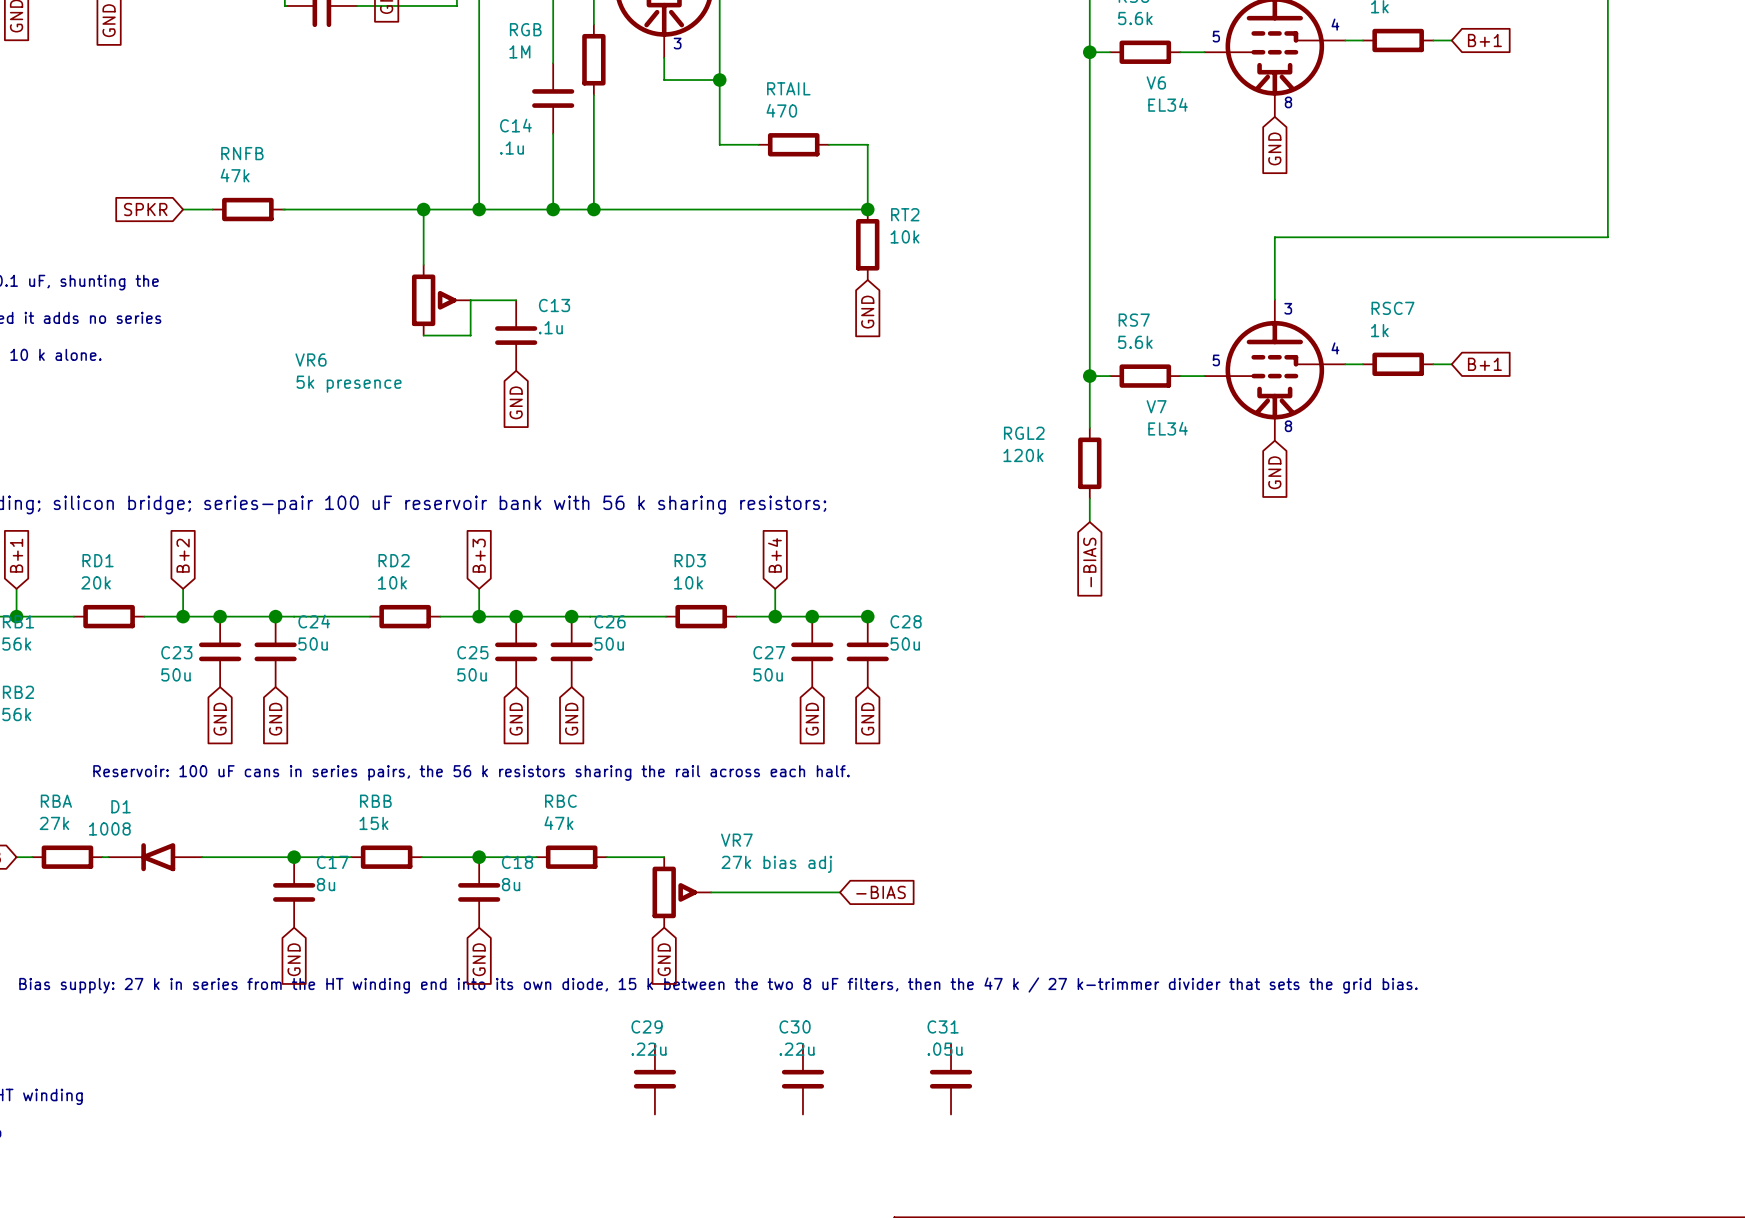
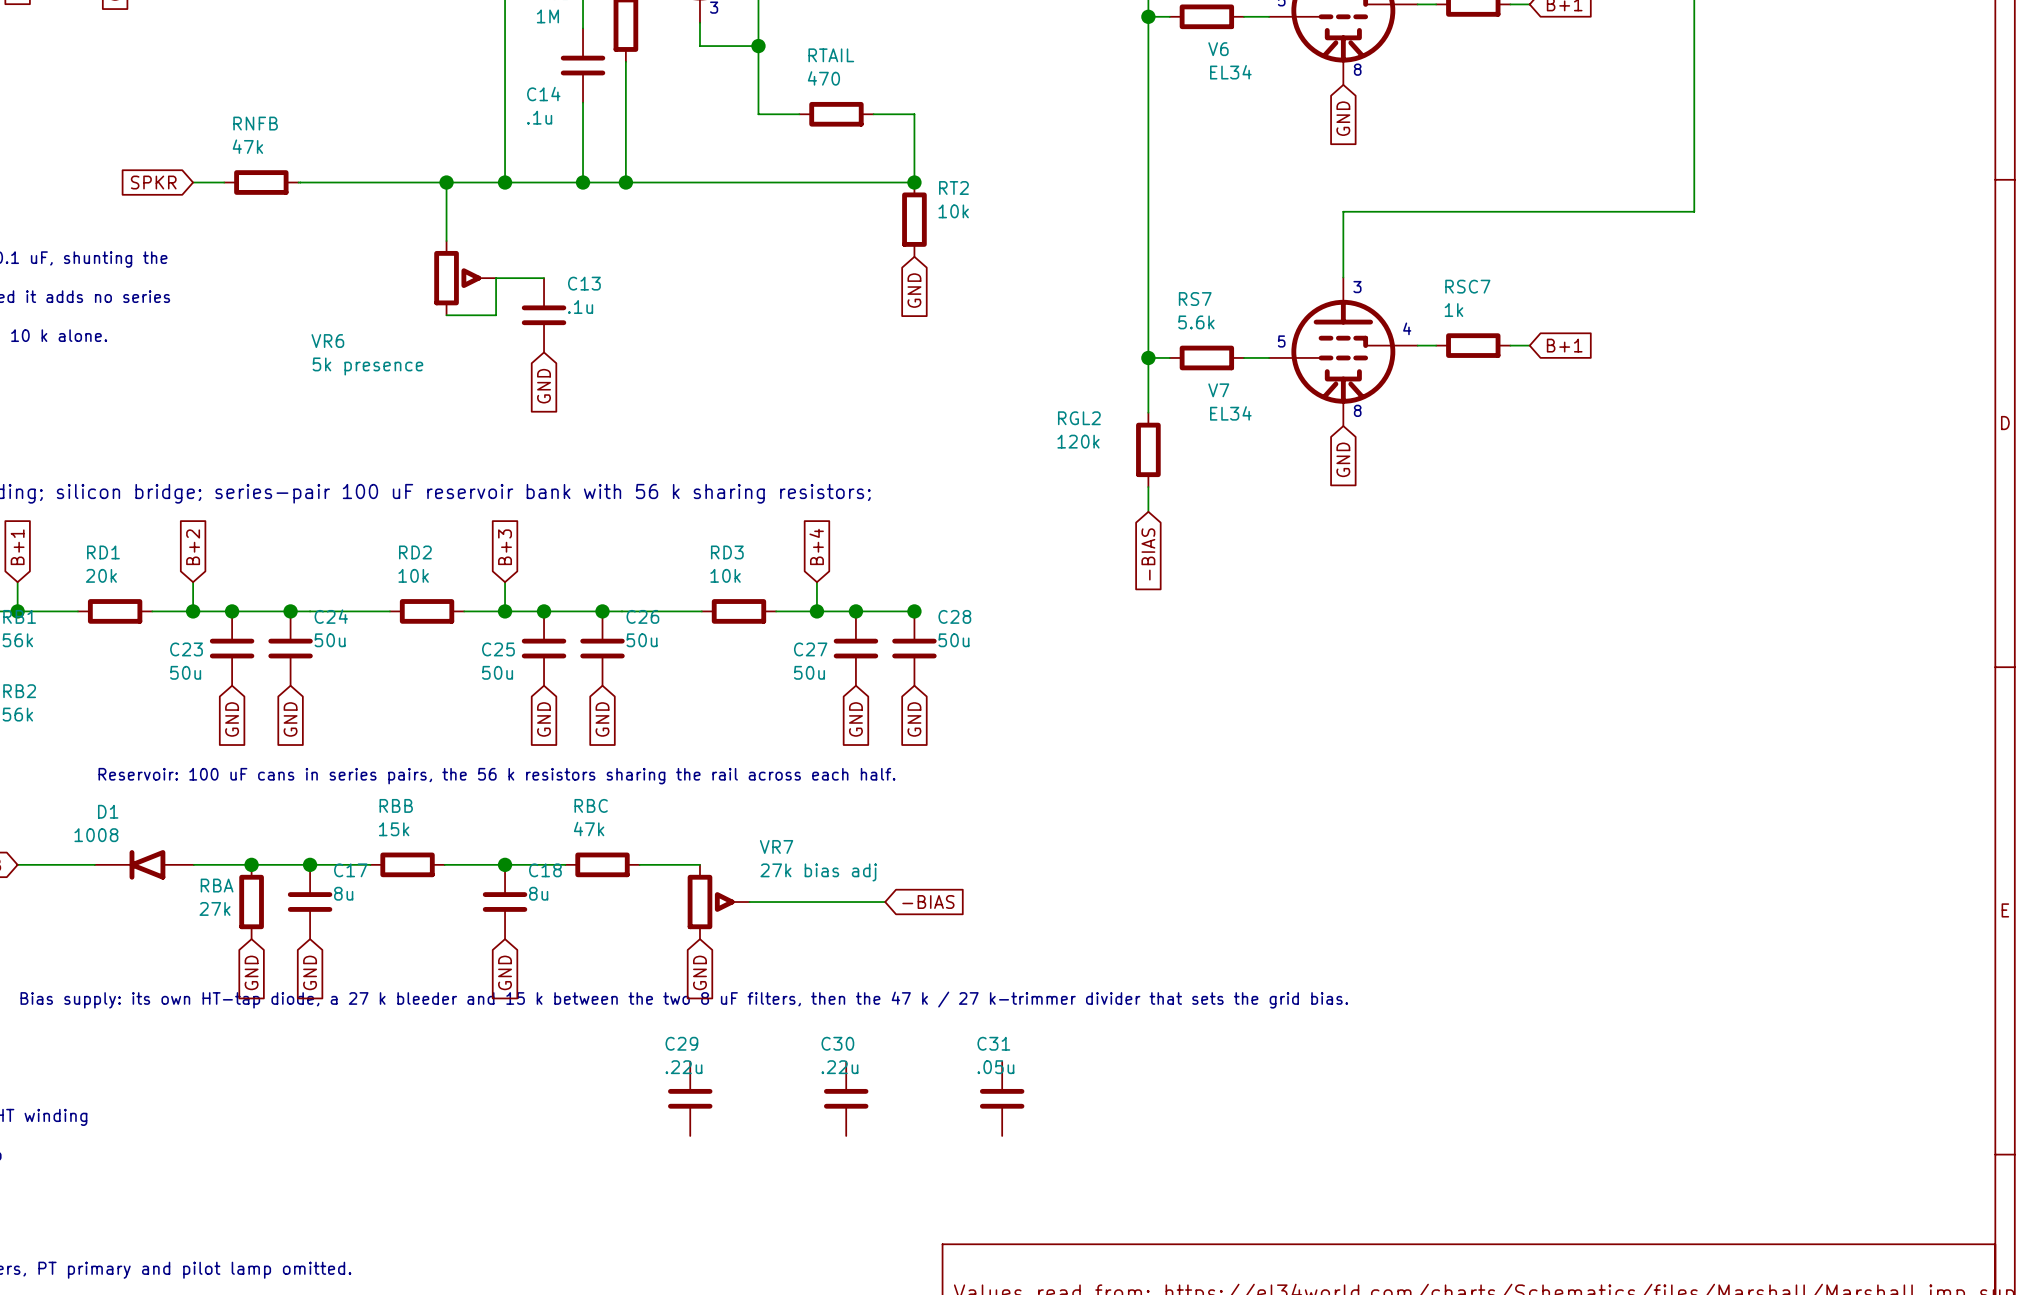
RBA name position: RBA (56, 801) -> RBA (217, 885)
RBA value position: 27k (54, 823) -> 27k (215, 908)
wire: none -> (34, 864) (94, 864)
RBA rotation: 0° (67, 857) -> 90° clockwise (251, 902)
RBA position: (67, 857) -> (251, 902)
D1 position: (155, 857) -> (144, 864)
junction: none -> (251, 864)
global label: none -> GND (251, 972)
text: Bias supply: 27 k in series from the HT winding end into its own diode, 15 k between the two 8 uF filters, then the 47 k / 27 k-trimmer divider that sets the grid bias. (718, 985) -> Bias supply: its own HT-tap diode, a 27 k bleeder and 15 k between the two 8 uF filters, then the 47 k / 27 k-trimmer divider that sets the grid bias. (684, 1000)

